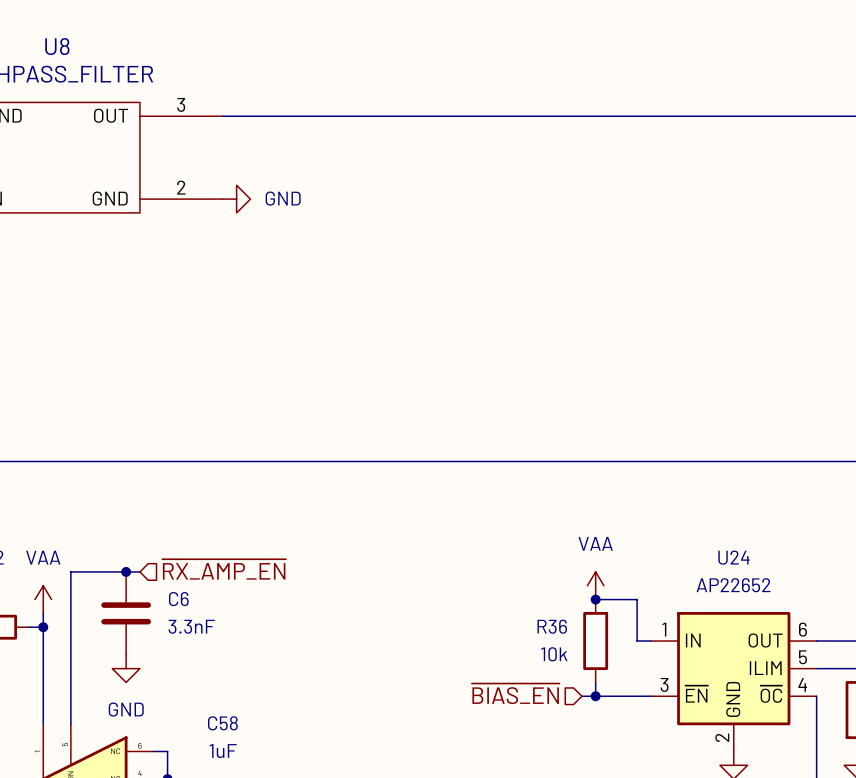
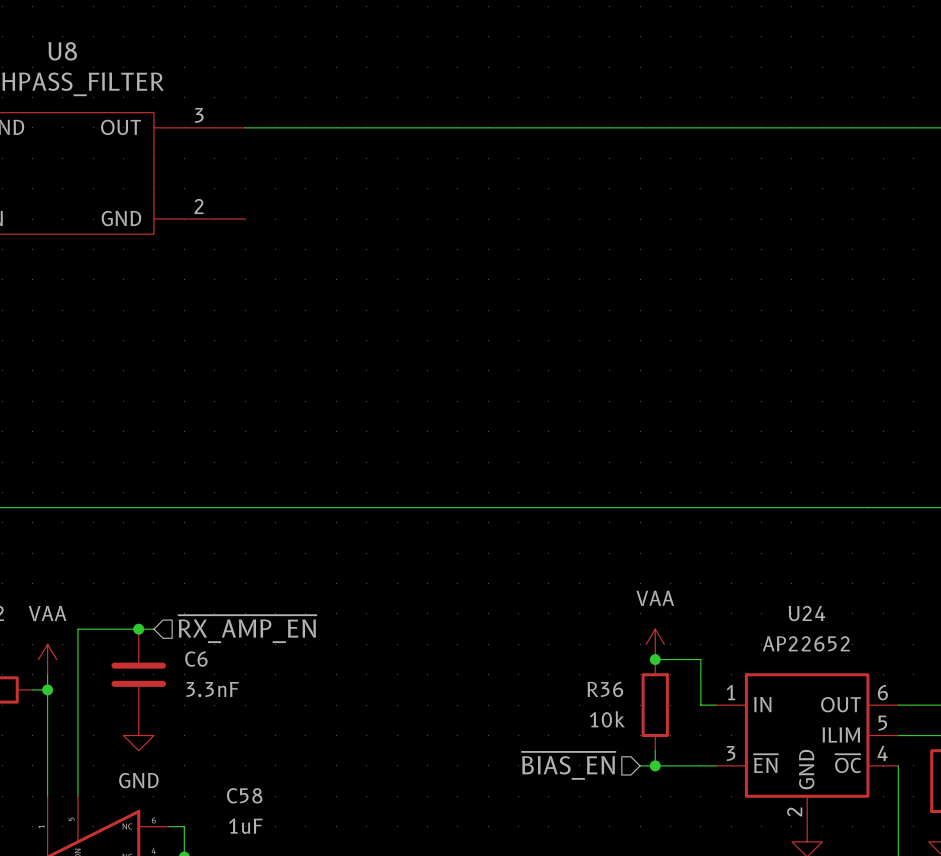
power symbol: GND (236, 199) -> none

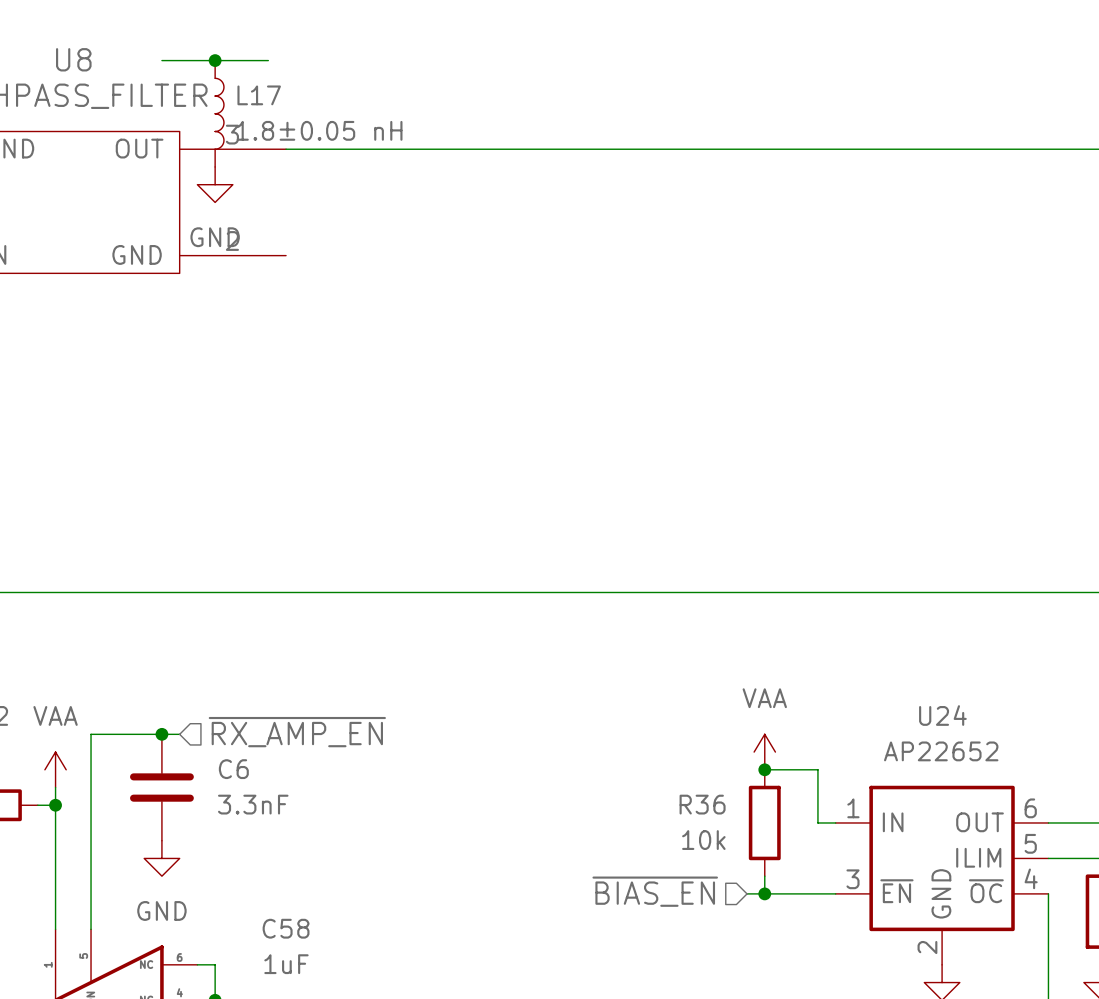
wire: none -> (161, 60) (268, 60)
junction: none -> (215, 60)
L17: none -> 1.8±0.05 nH (219, 113)
power symbol: none -> GND (215, 184)

